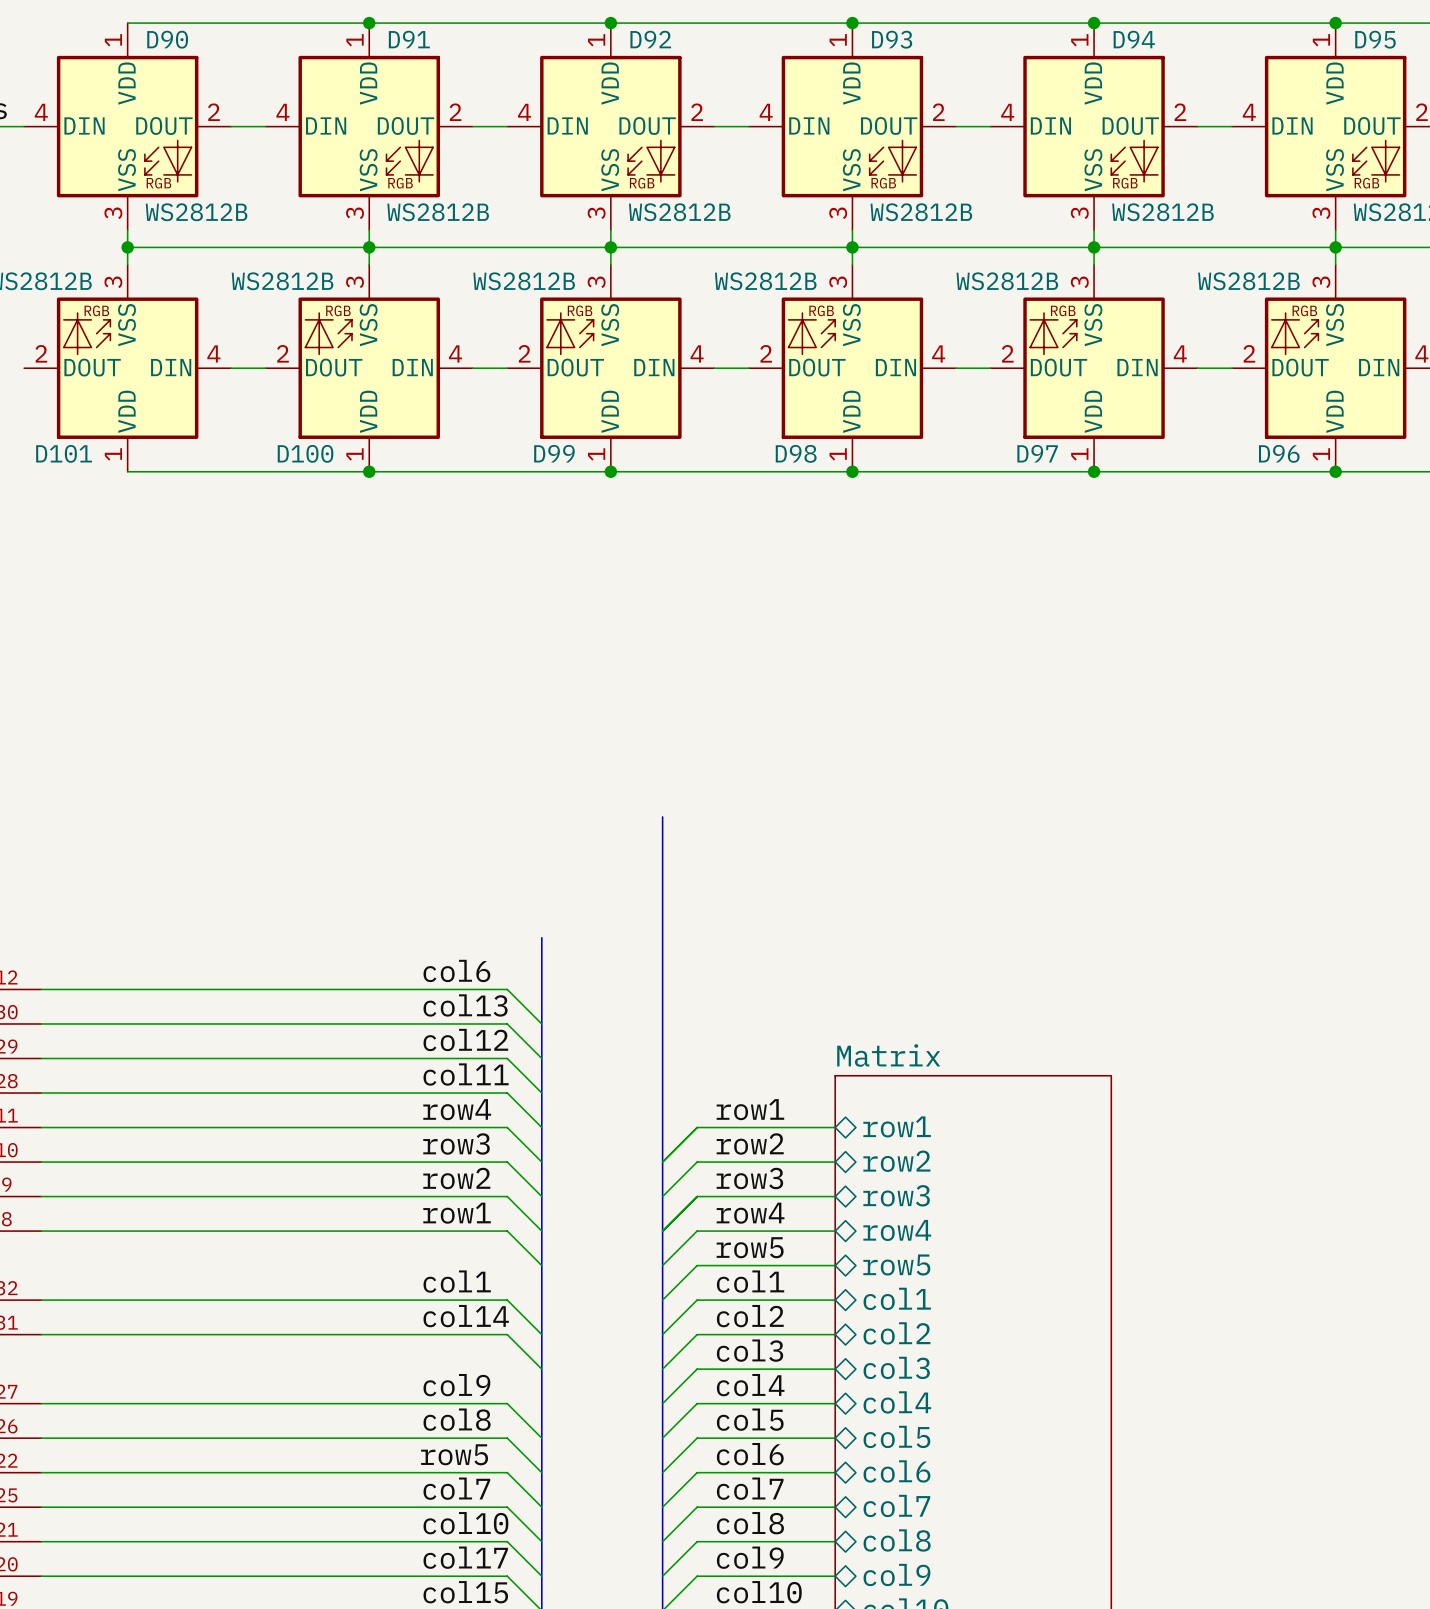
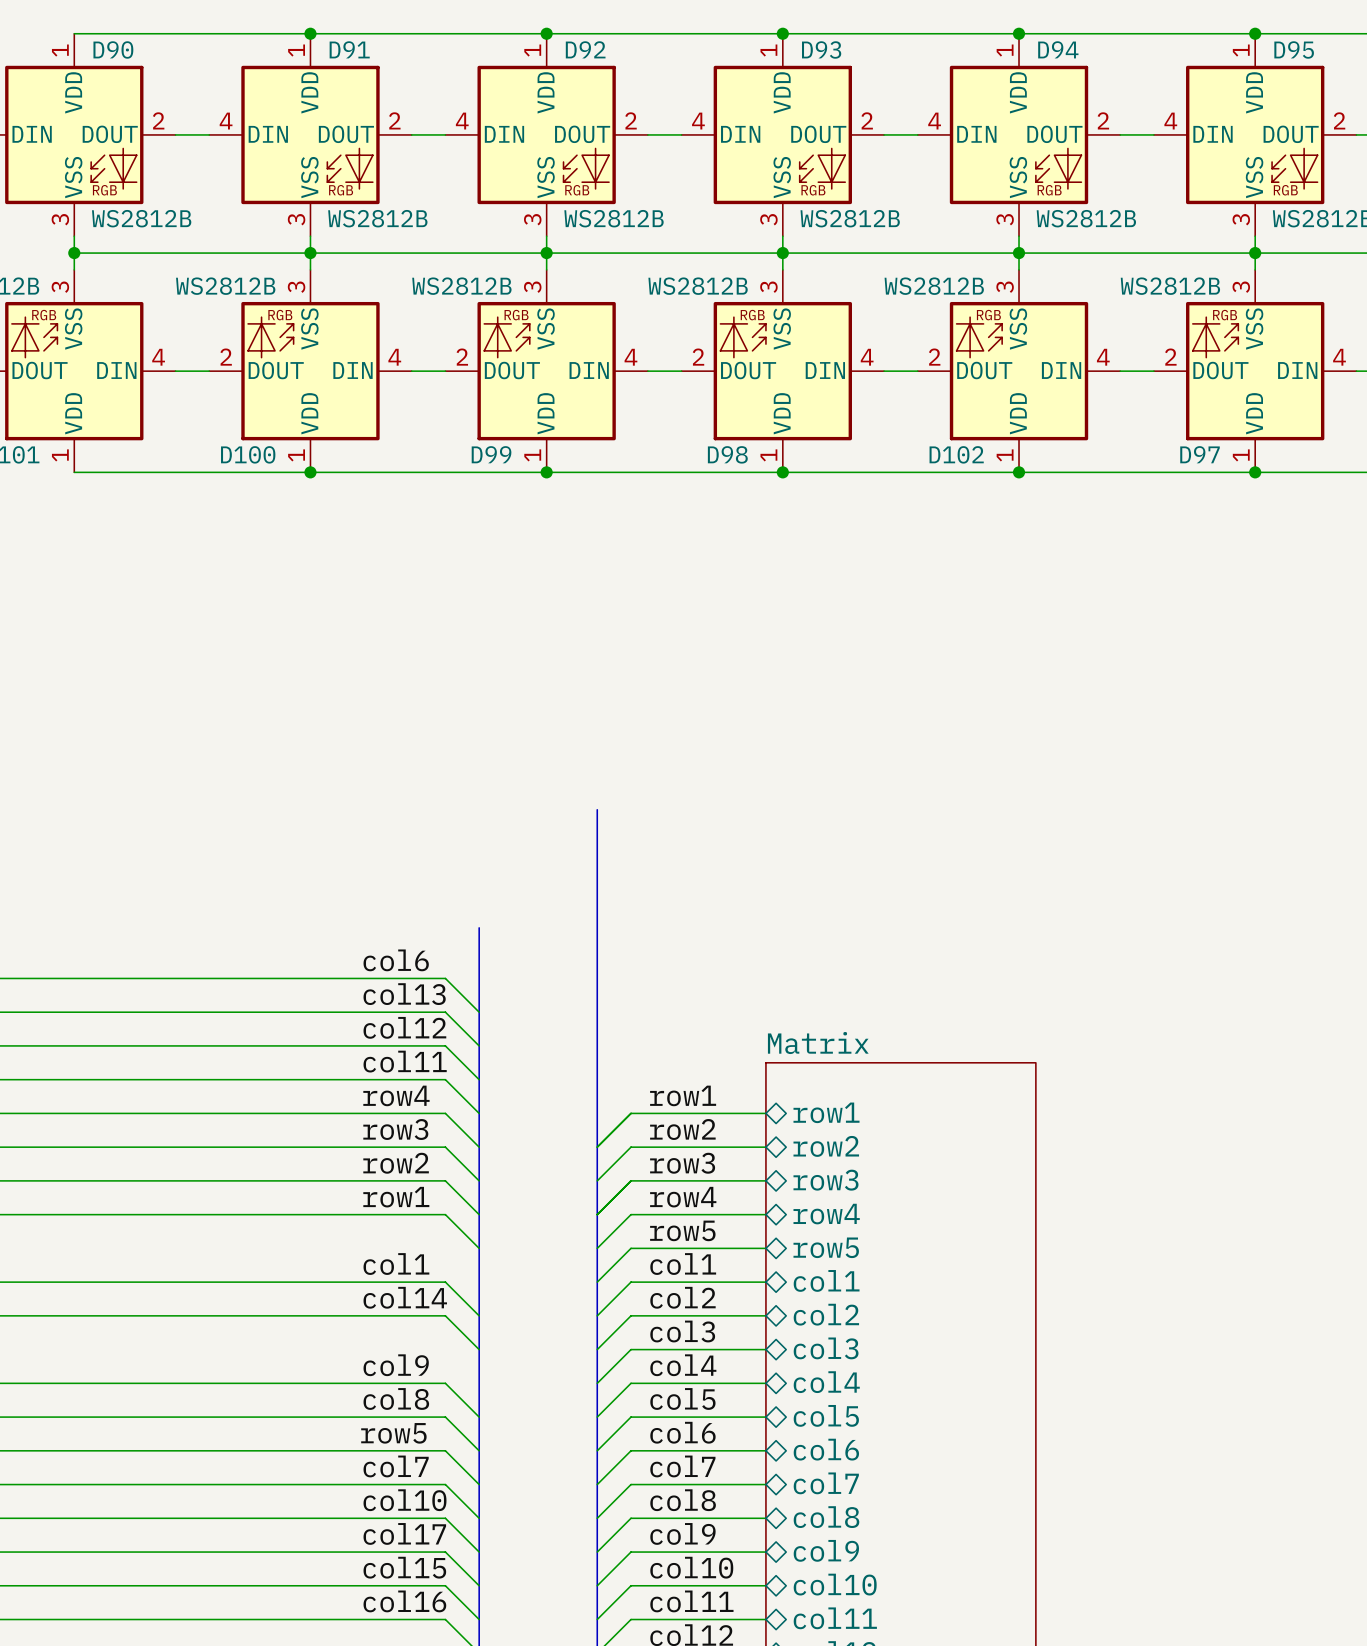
D97 name: D97 (1037, 453) -> D102 (956, 454)
D96 name: D96 (1279, 453) -> D97 (1200, 454)

